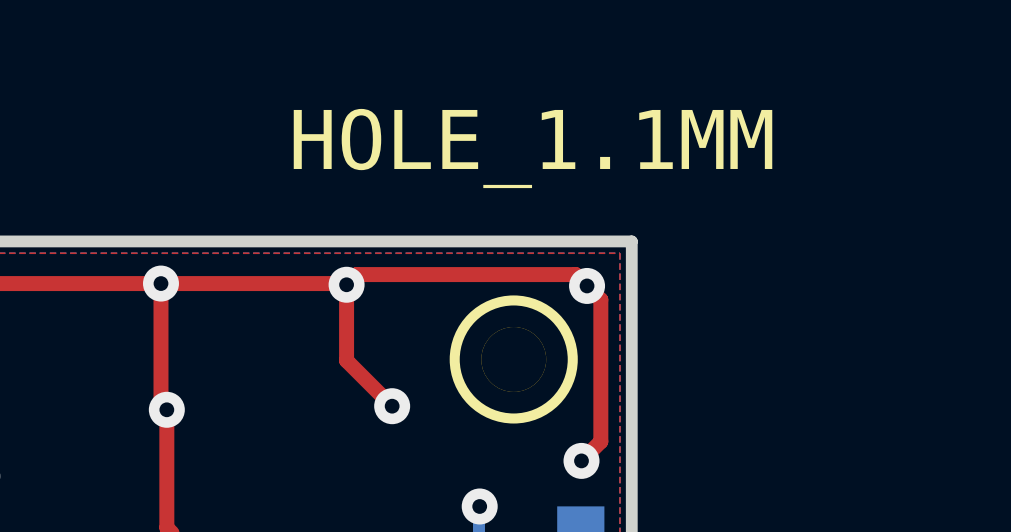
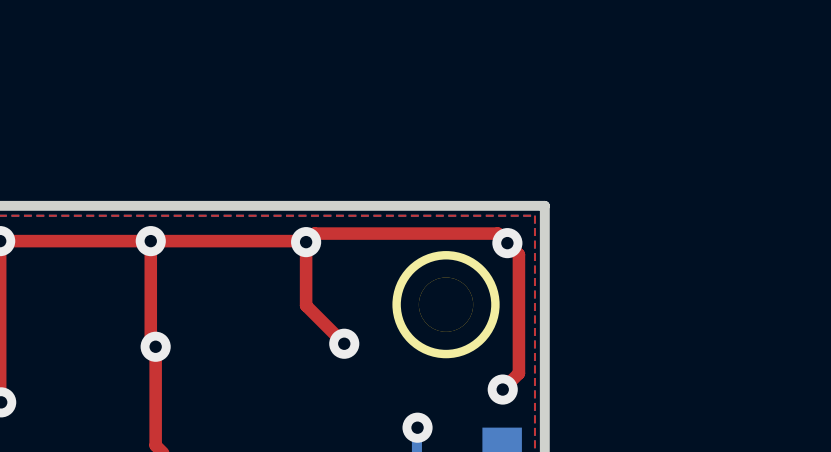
HOLE_1.1MM name: HOLE_1.1MM (533, 148) -> none

